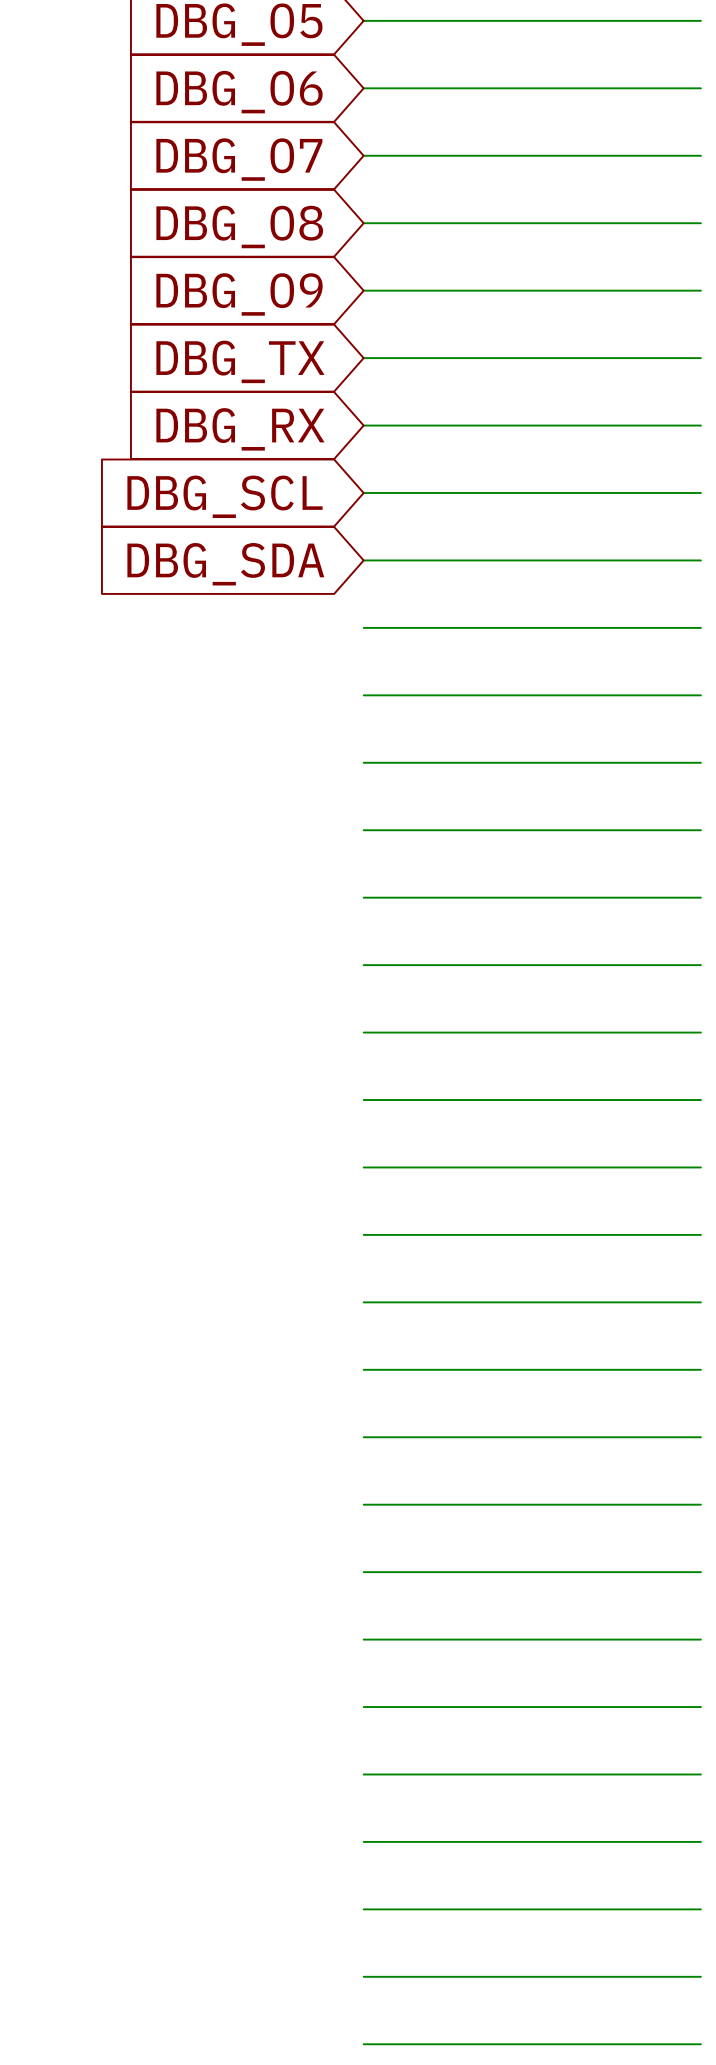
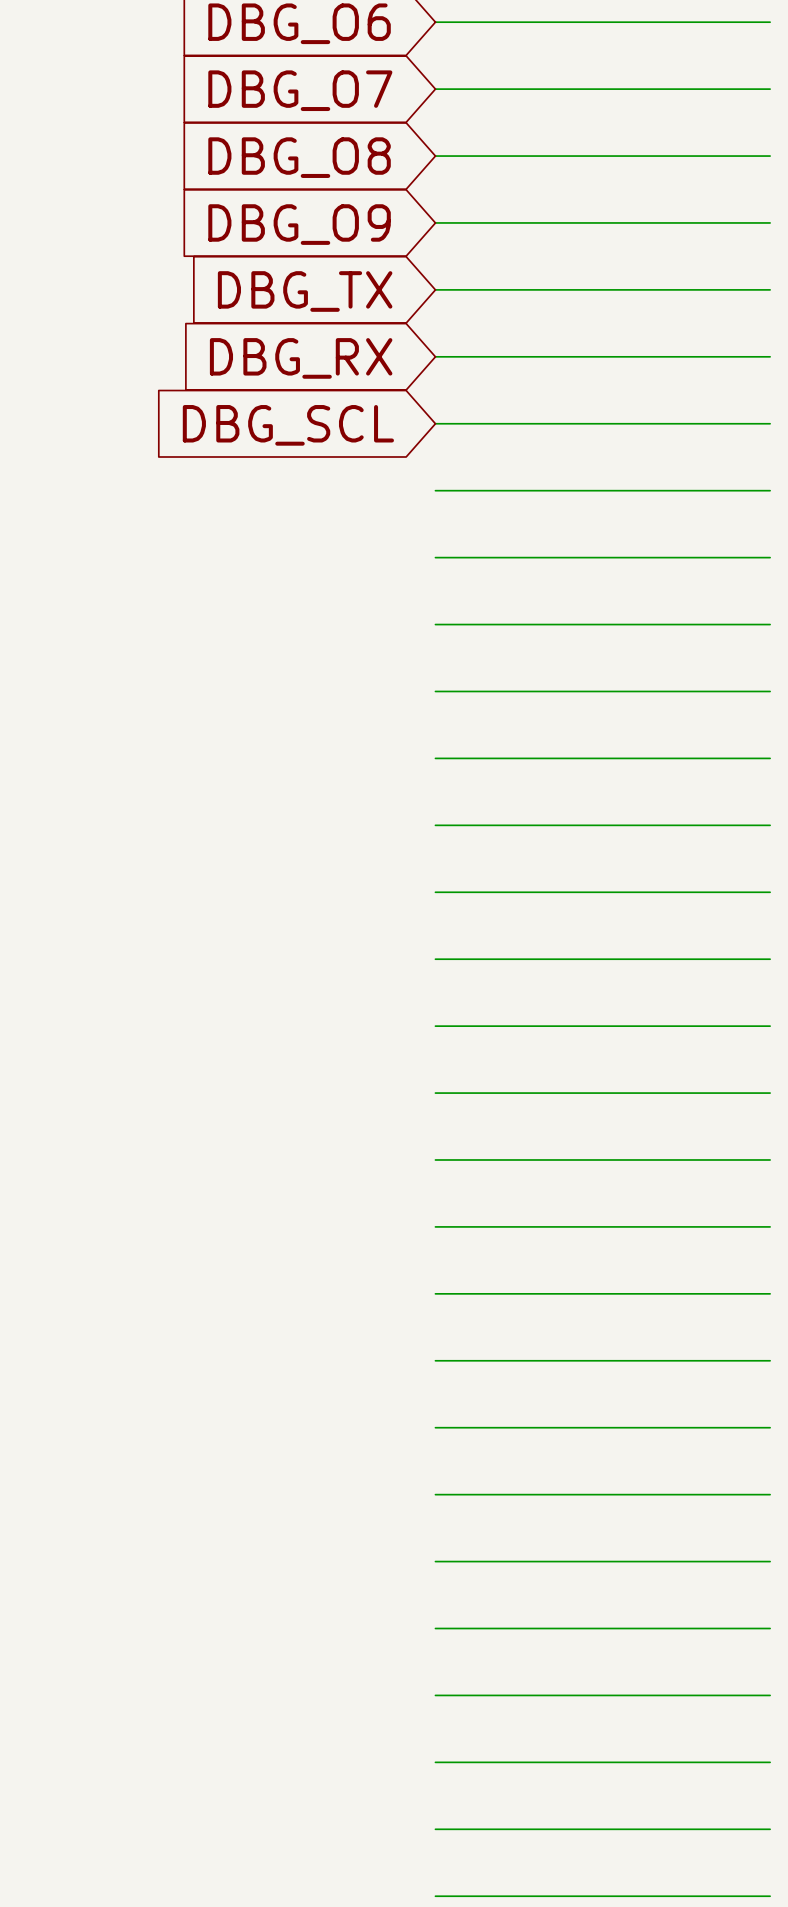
global label: DBG_SDA (225, 564) -> none

